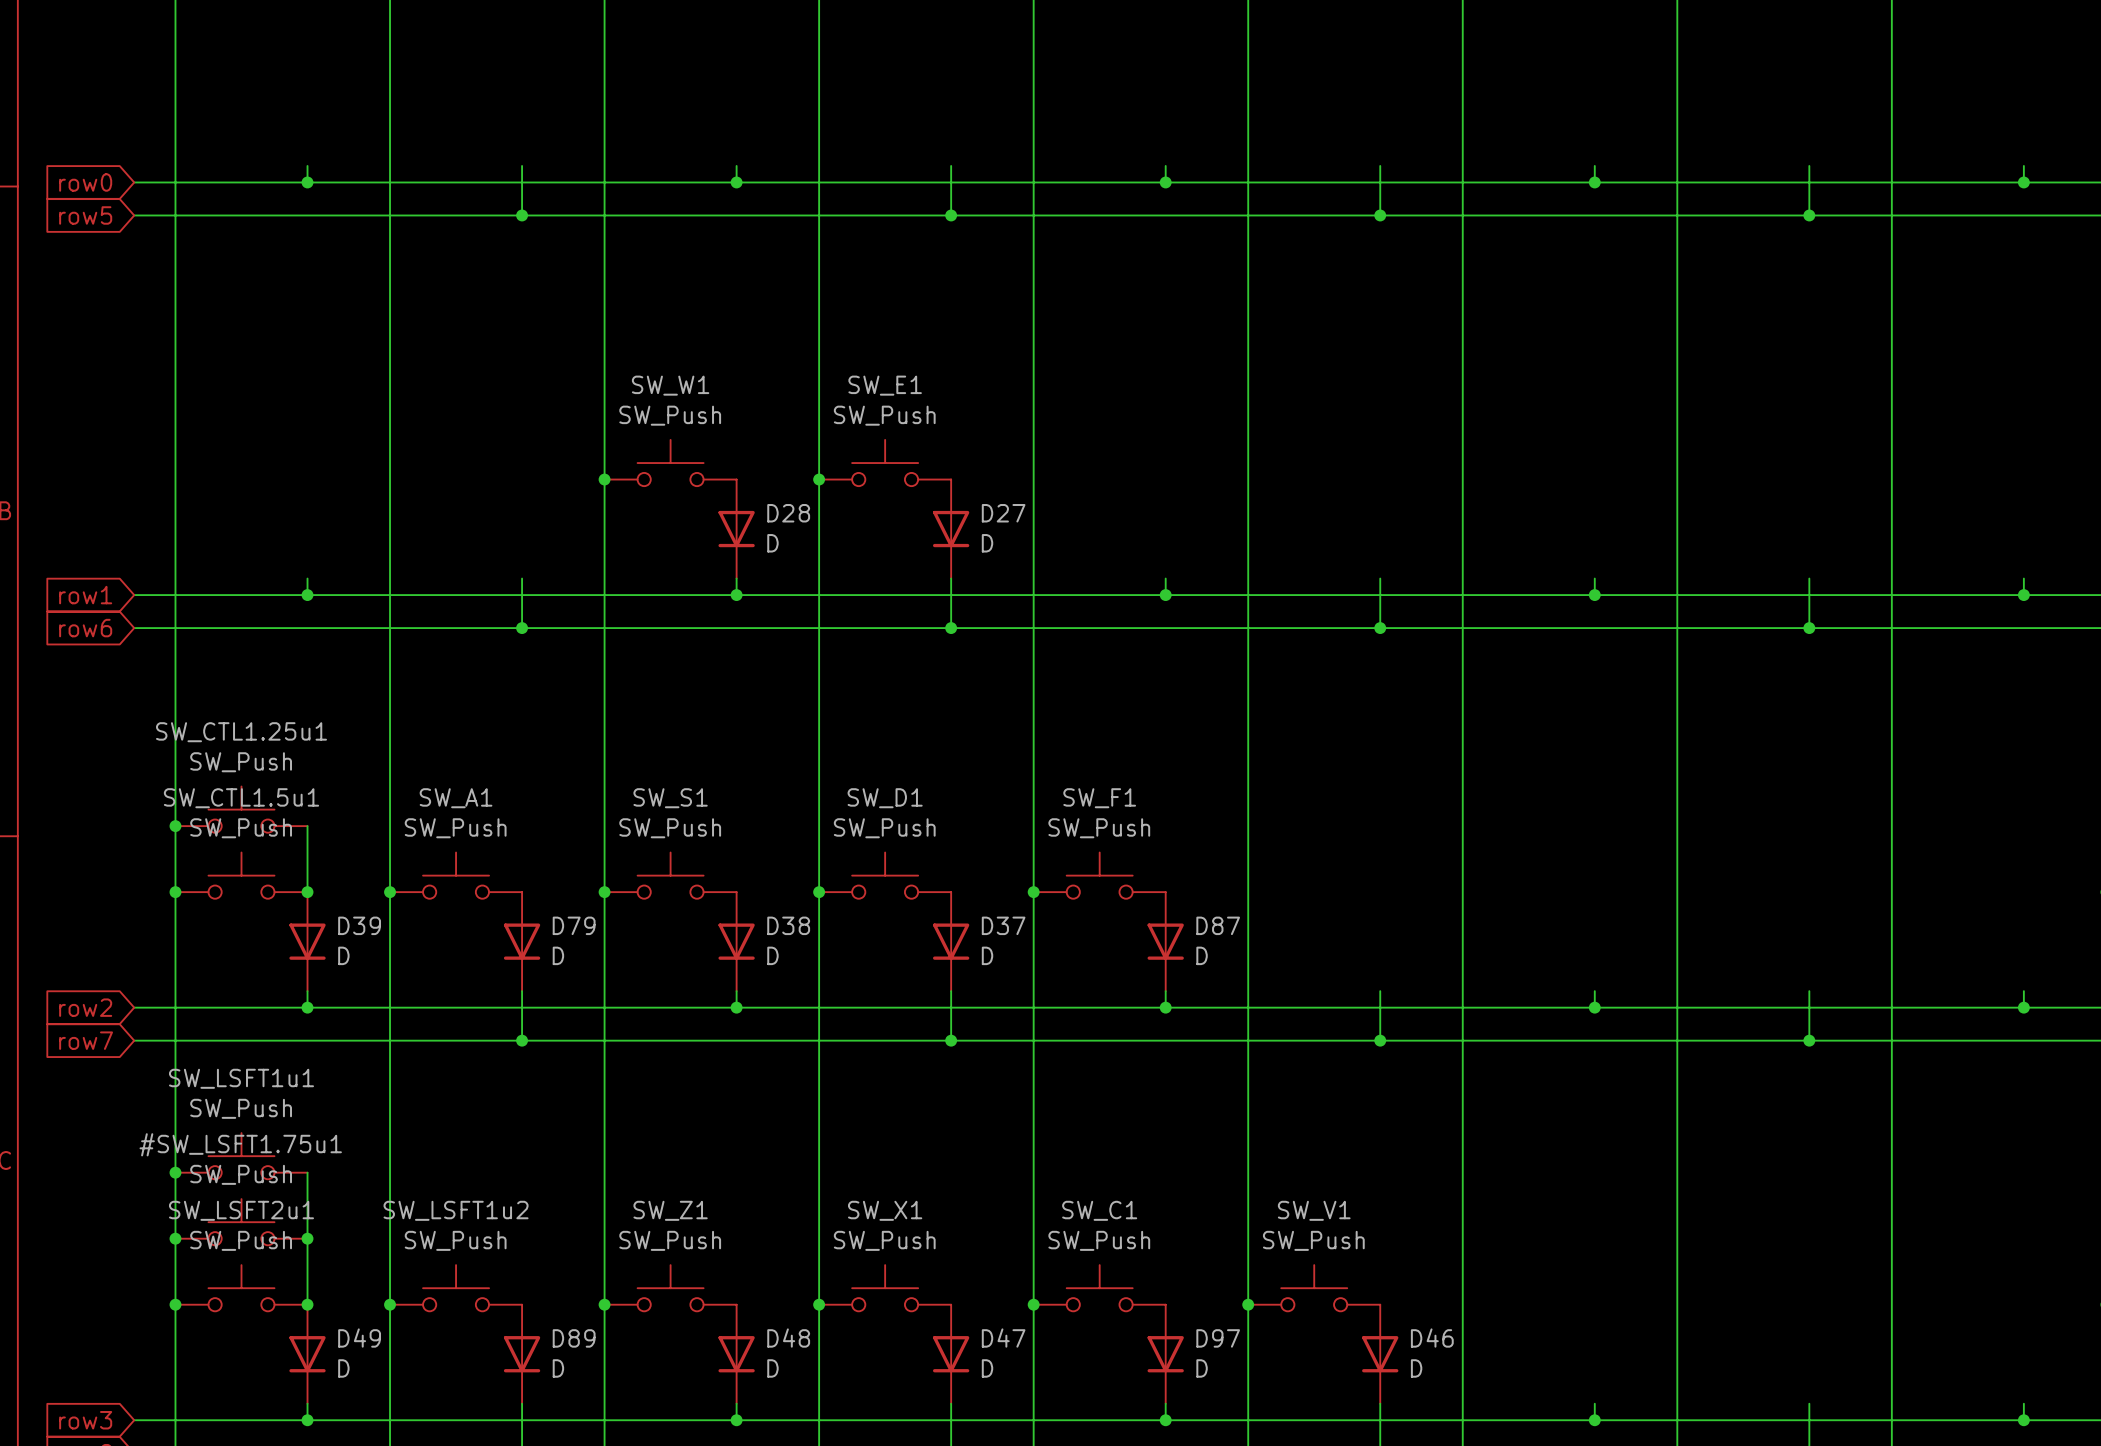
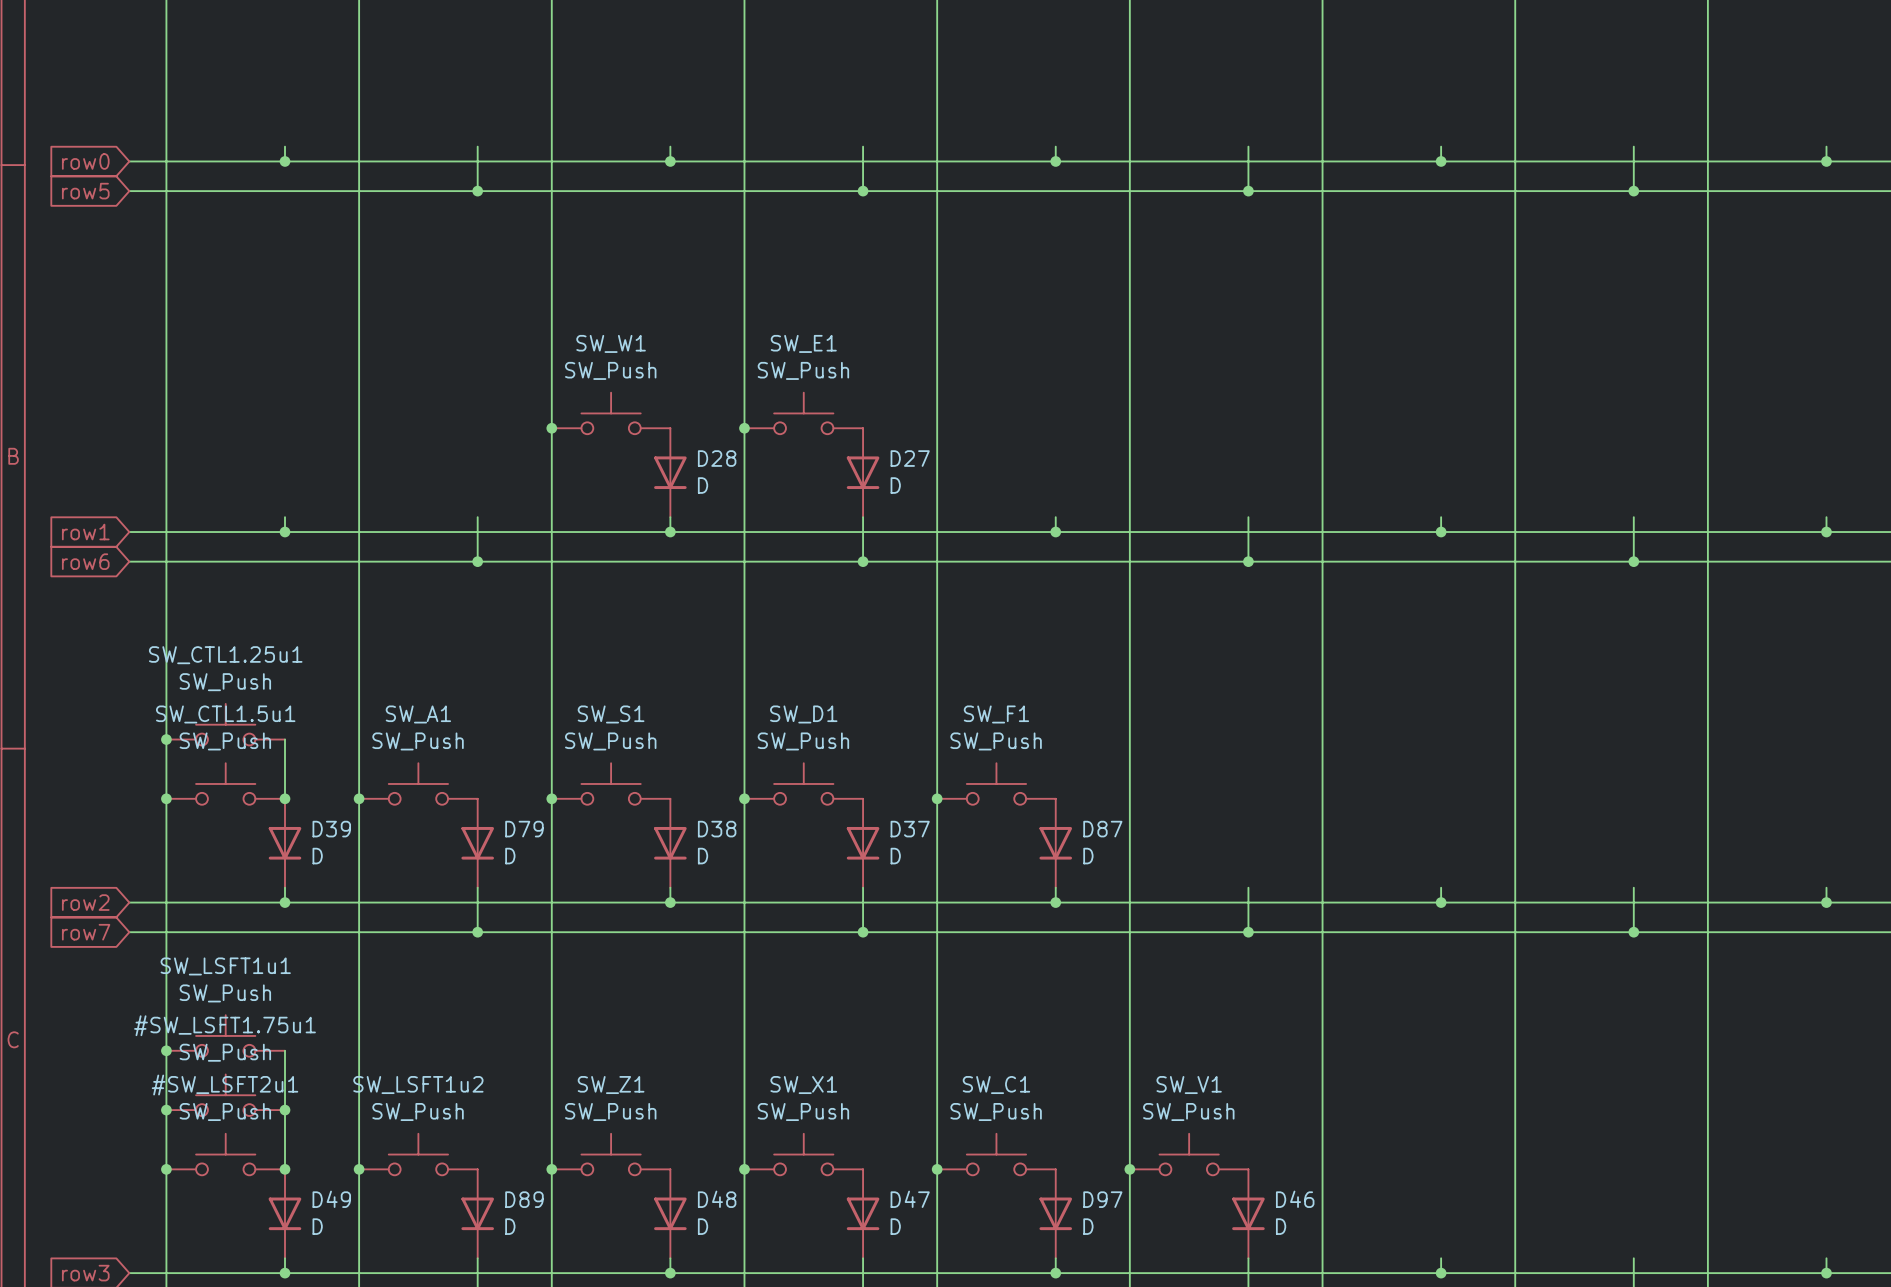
SW_LSFT2u1: SW_Push (241, 1288) -> none
#SW_LSFT2u1: none -> SW_Push (225, 1154)

